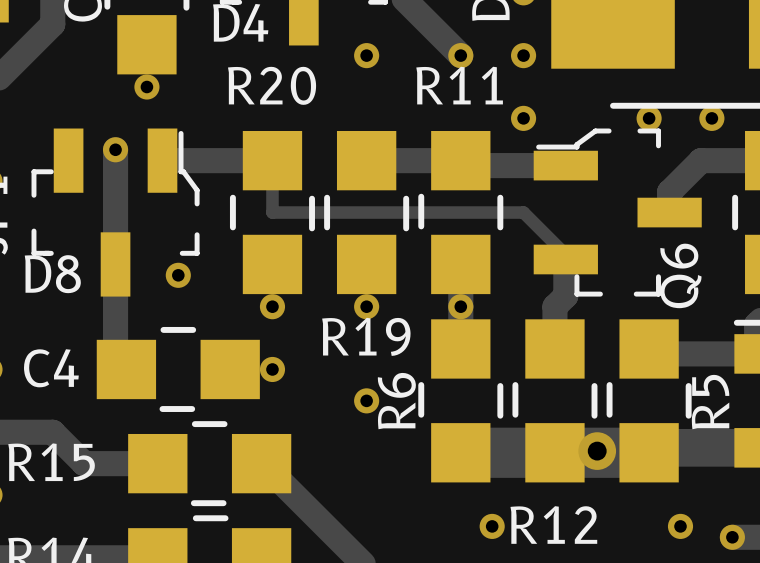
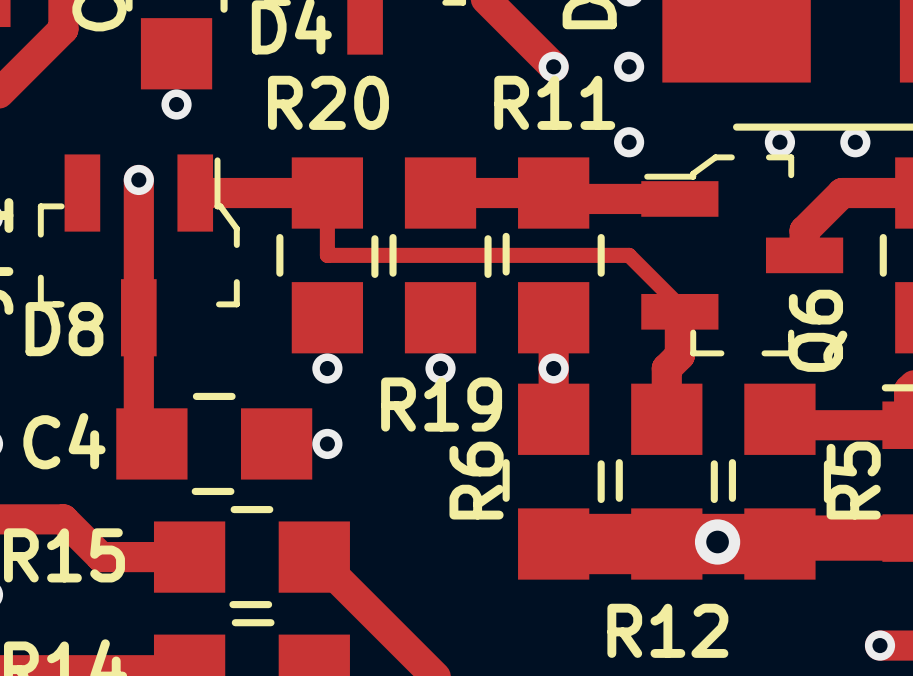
via: (366, 55) -> none
via: (178, 275) -> none
via: (366, 400) -> none
via: (492, 526) -> none
via: (680, 526) -> none

